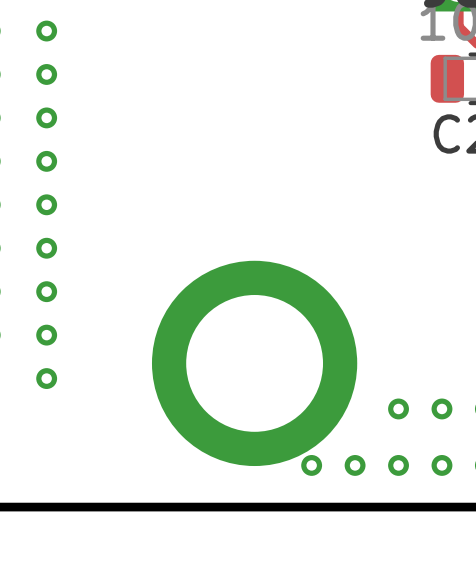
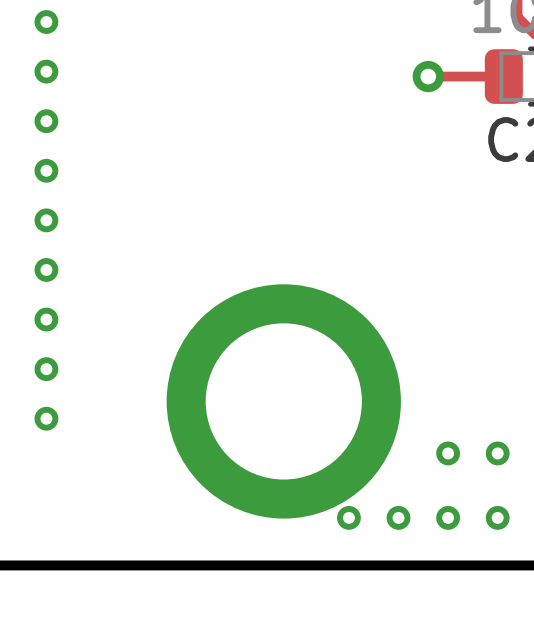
top track: none -> (428, 76) (503, 76)
via: none -> (428, 76)

